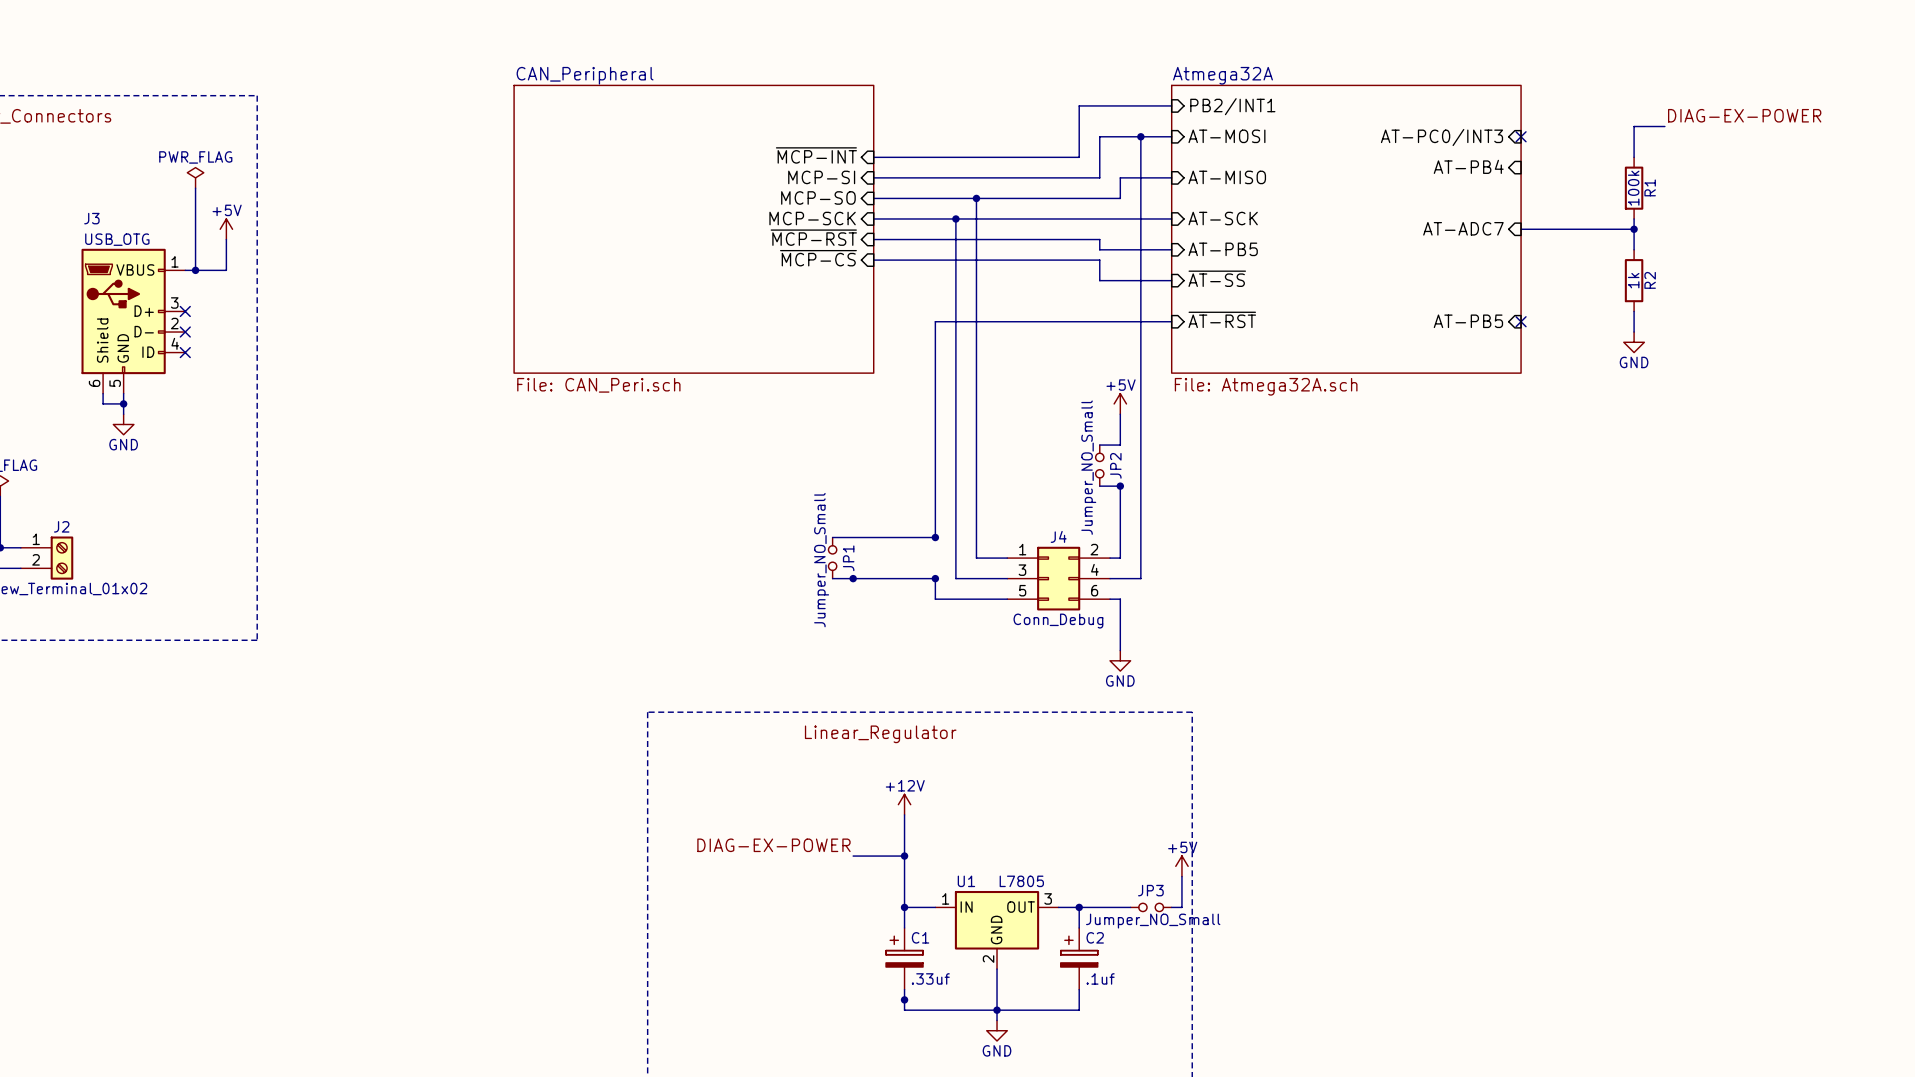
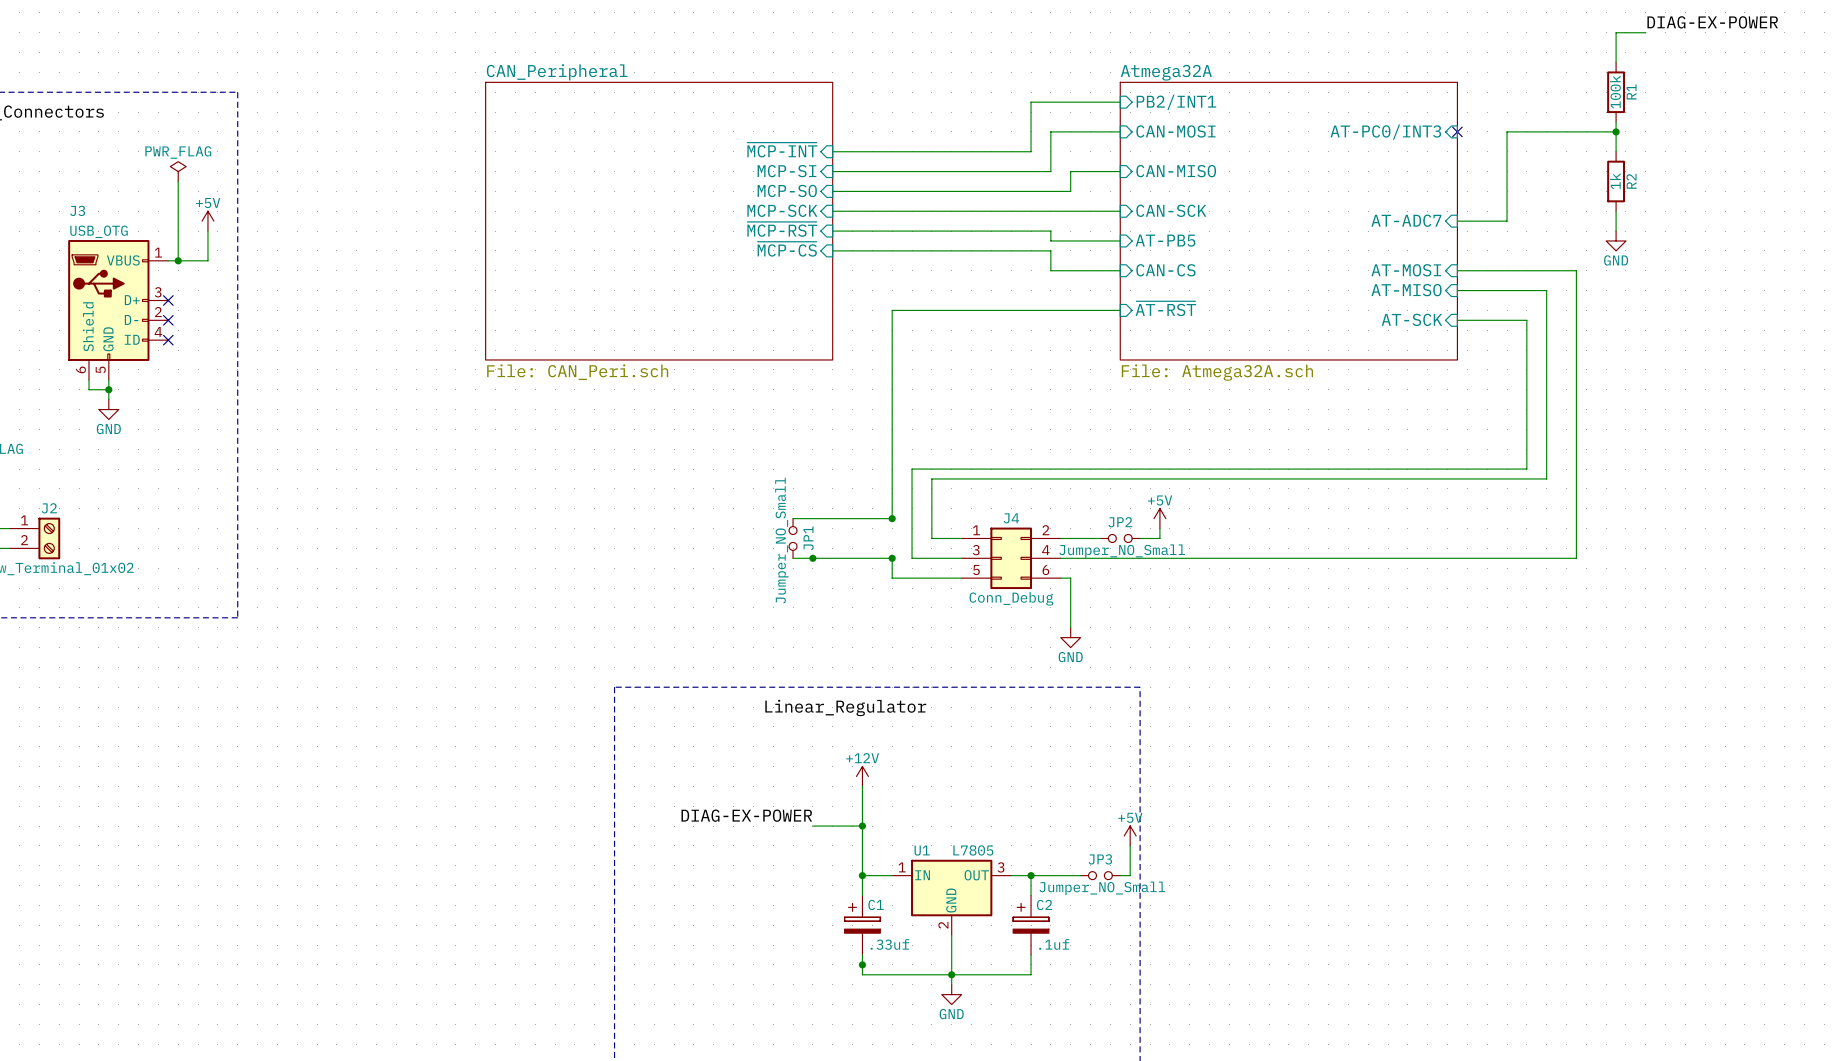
label position: DIAG-EX-POWER (1744, 115) -> DIAG-EX-POWER (1712, 22)
wire: (1664, 126) (1634, 126) (1634, 157) -> (1645, 32) (1616, 32) (1616, 62)
wire: (1140, 136) (1140, 578) -> (1457, 270) (1576, 270) (1576, 558) (1090, 558)
junction: (1140, 136) -> none
sheet pin: AT-MOSI (1226, 136) -> CAN-MOSI (1175, 131)
junction: none -> (1616, 131)
sheet pin: AT-PB4 (1468, 166) -> none
sheet pin: AT-MISO (1227, 177) -> CAN-MISO (1176, 171)
R1 position: (1634, 188) -> (1616, 92)
wire: (976, 198) (976, 496) -> (1457, 290) (1546, 290) (1546, 478) (931, 478)
junction: (976, 198) -> none
wire: (955, 218) (955, 486) -> (1050, 469) (912, 469)
junction: (955, 218) -> none
sheet pin: AT-SCK (1223, 218) -> CAN-SCK (1171, 210)
wire: (1634, 218) (1634, 249) -> (1616, 121) (1616, 151)
wire: (1572, 229) (1634, 229) -> (1507, 221) (1507, 131) (1616, 131)
junction: (1634, 229) -> none
sheet pin: ~{AT-SS} (1217, 278) -> CAN-CS (1165, 270)
sheet pin: none -> AT-MOSI (1406, 270)
R2 position: (1634, 280) -> (1616, 181)
sheet pin: none -> AT-MISO (1406, 290)
wire: (1634, 311) (1634, 332) -> (1616, 211) (1616, 231)
sheet pin: AT-PB5 (1468, 321) -> none
no-connect mark: (1521, 321) -> none
sheet pin: none -> AT-SCK (1411, 319)
wire: none -> (1457, 320) (1526, 320) (1526, 469) (1070, 469)
power symbol position: GND (1634, 342) -> GND (1616, 240)
power symbol position: +5V (1120, 403) -> +5V (1159, 518)
wire: (1120, 414) (1120, 445) (1099, 445) -> none
JP2 rotation: 0° (1099, 465) -> 90° clockwise (1120, 538)
JP2 position: (1099, 465) -> (1120, 538)
JP2 name position: JP2 (1115, 465) -> JP2 (1120, 522)
JP2 value position: Jumper_NO_Small (1088, 467) -> Jumper_NO_Small (1122, 551)
wire: (1120, 486) (1120, 558) -> (1100, 538) (1070, 538)
junction: (1120, 486) -> none
wire: none -> (1159, 528) (1159, 538) (1140, 538)

